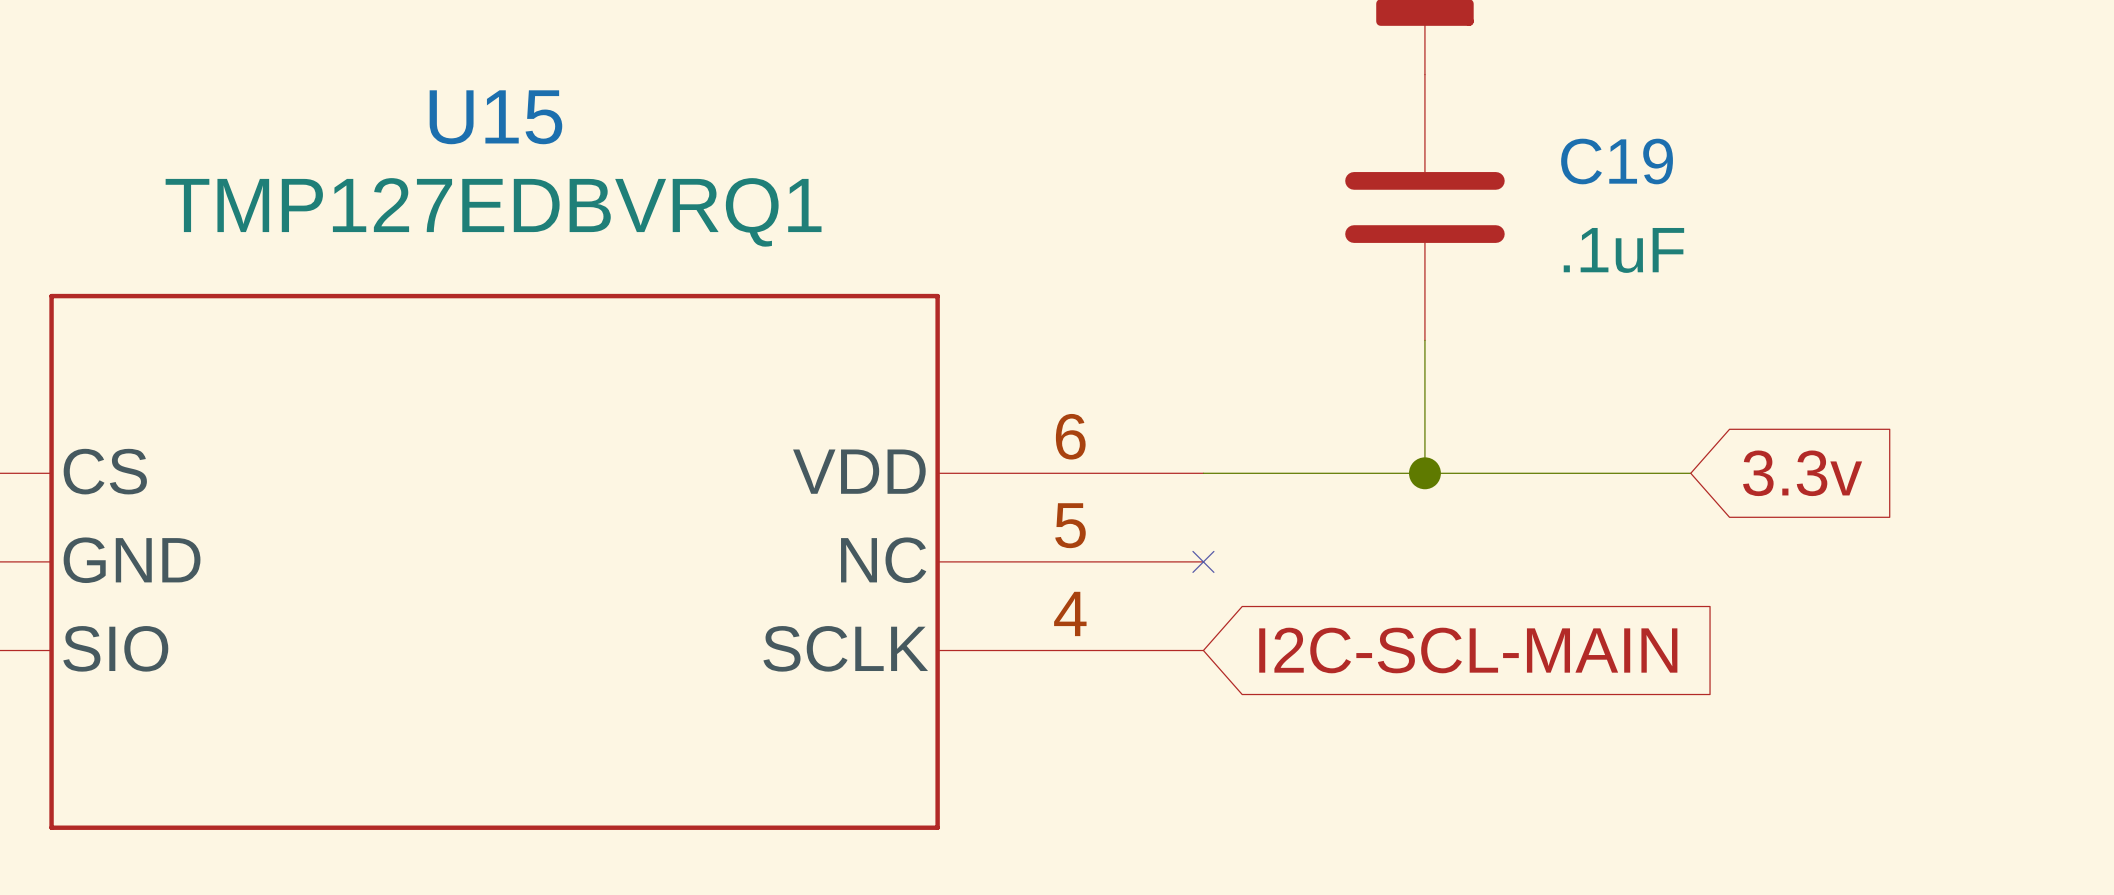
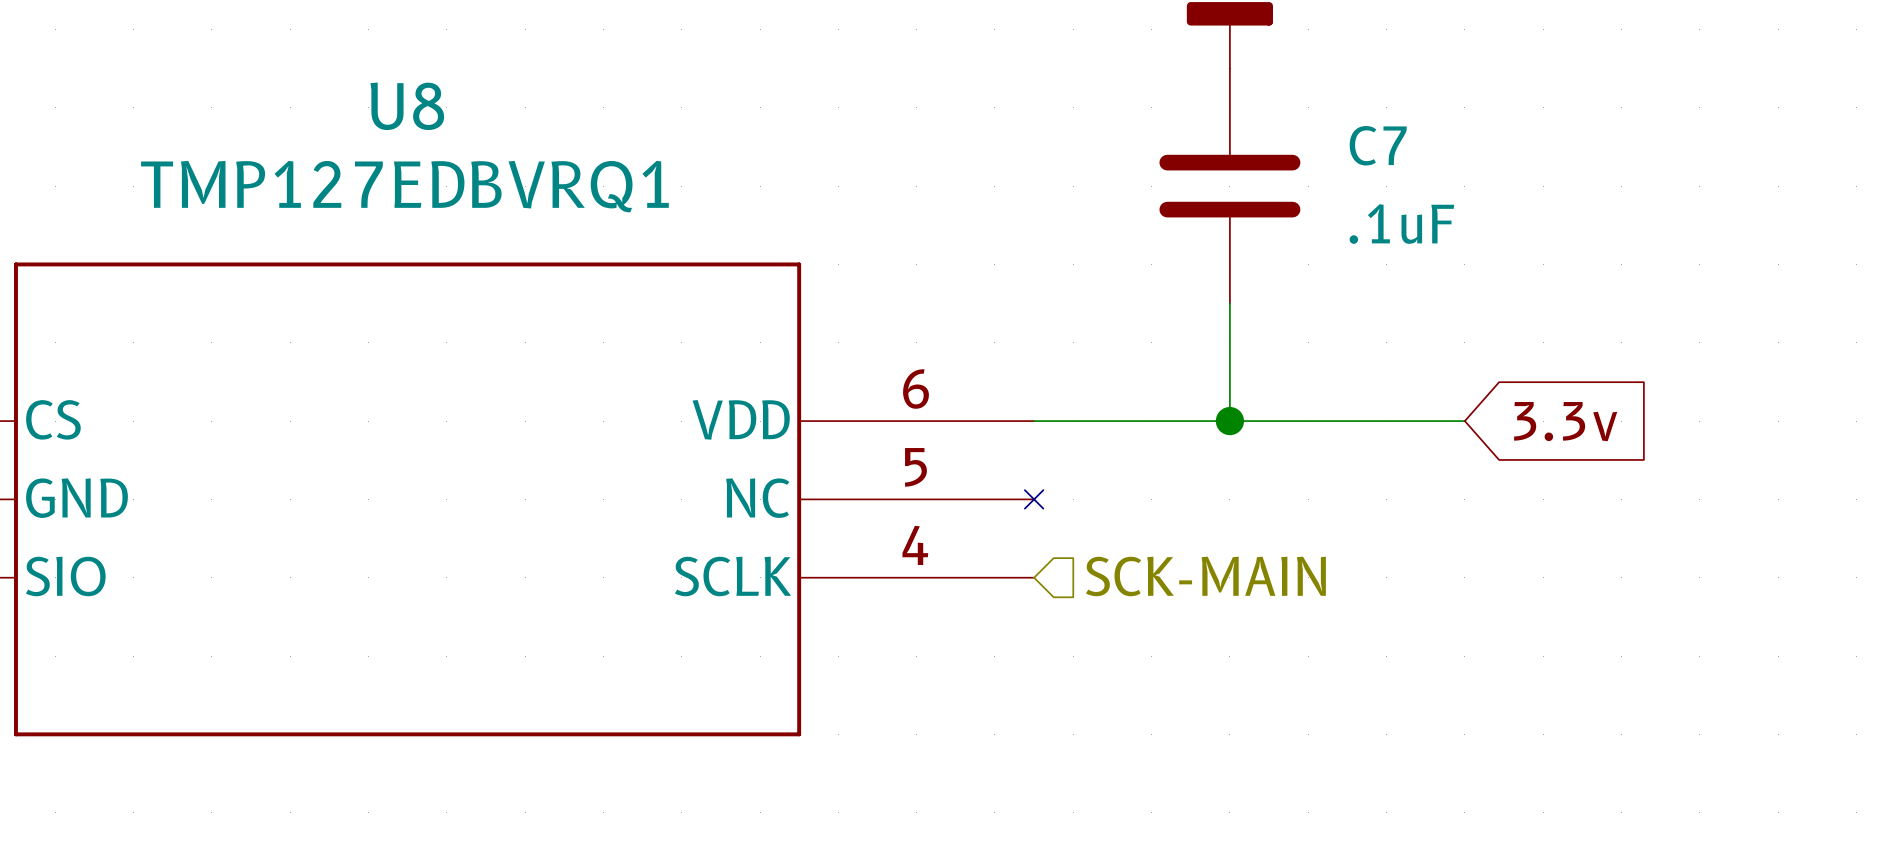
U15 name: U15 (495, 117) -> U8 (407, 106)
C19 name: C19 (1617, 161) -> C7 (1378, 145)
hierarchical label: none -> SCK-MAIN (1205, 576)
global label: I2C-SCL-MAIN (1468, 650) -> none

